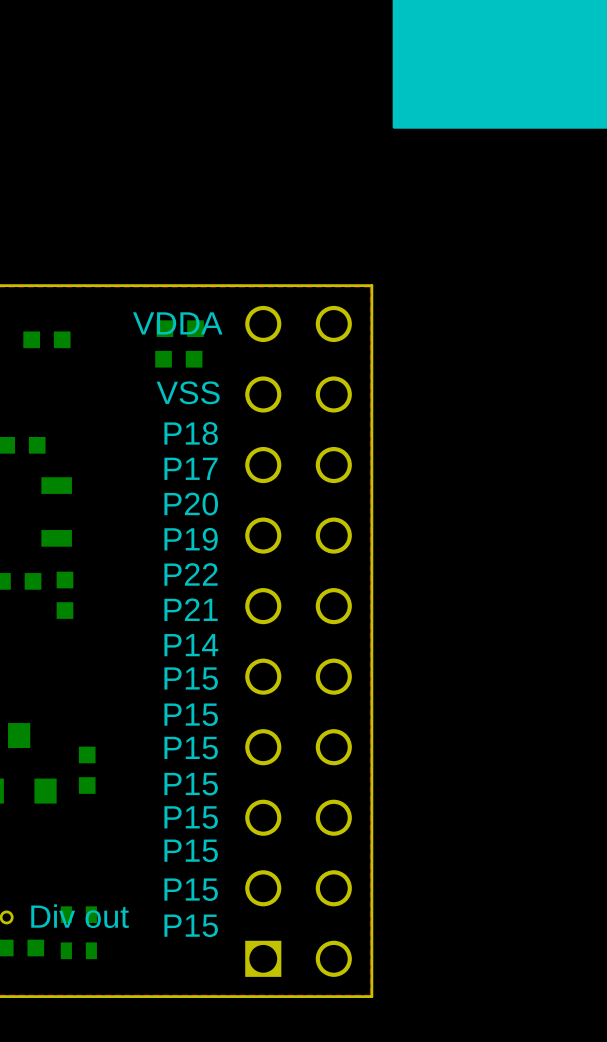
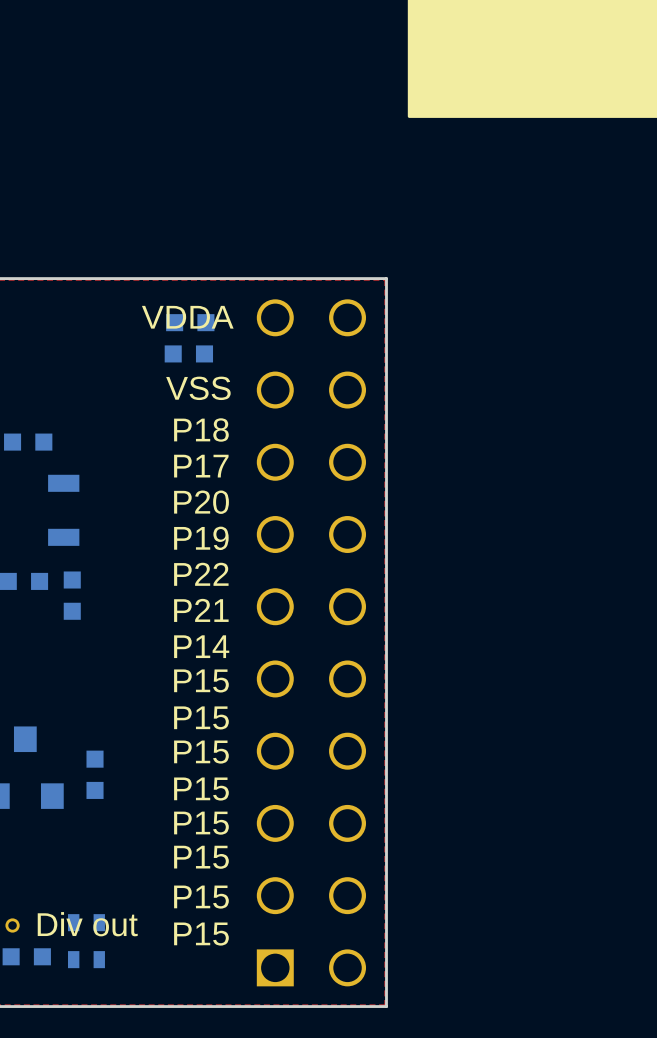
part: (46, 339) -> none

